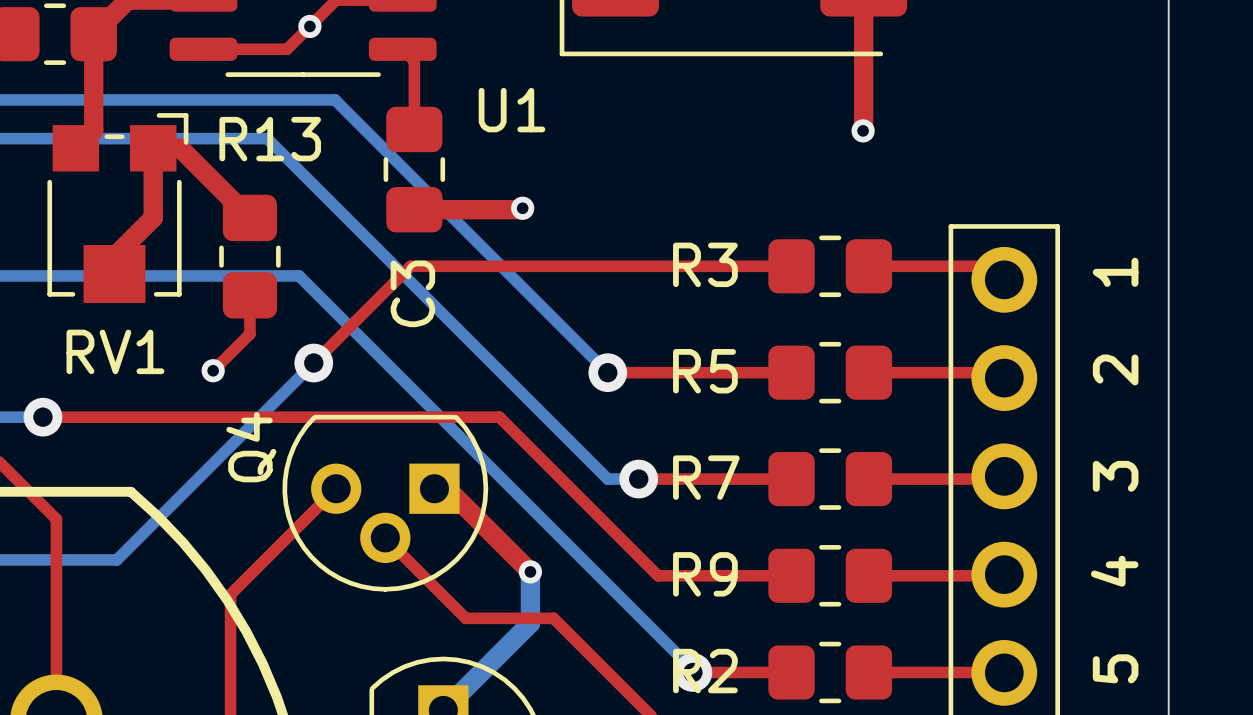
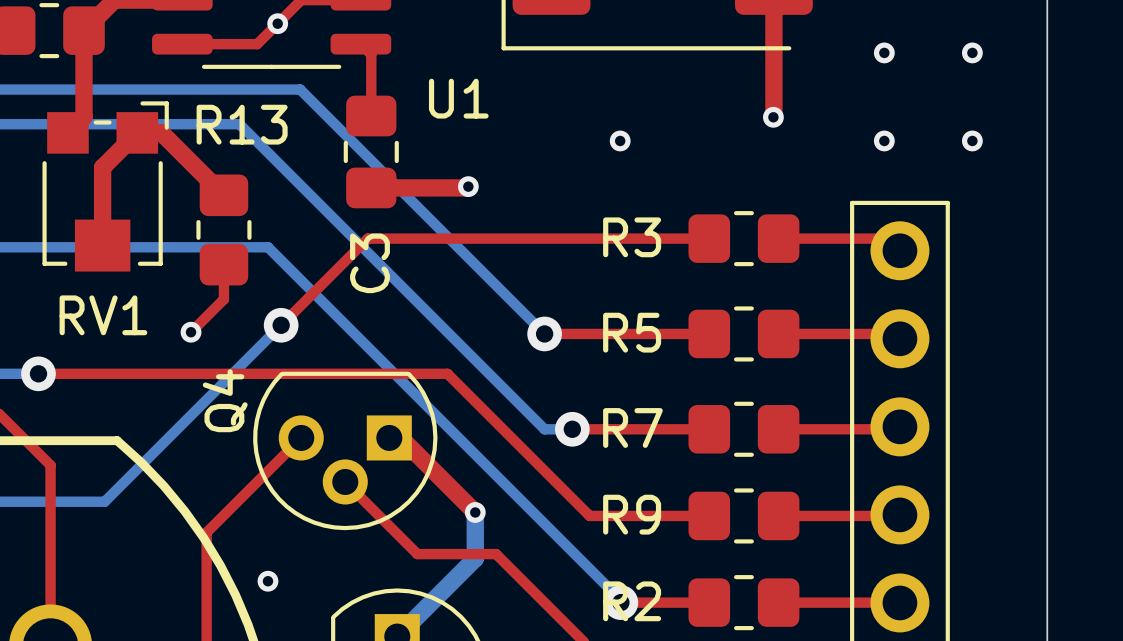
via: none -> (884, 52)
via: none -> (972, 52)
top track: (153, 148) (153, 217) (114, 256) -> (137, 132) (102, 167) (102, 229)
via: none -> (620, 140)
via: none -> (884, 140)
via: none -> (972, 140)
text: 1 (1115, 272) -> none
text: 2 (1115, 369) -> none
text: 3 (1115, 476) -> none
text: 4 (1114, 571) -> none
via: none -> (267, 581)
text: 5 (1115, 668) -> none

